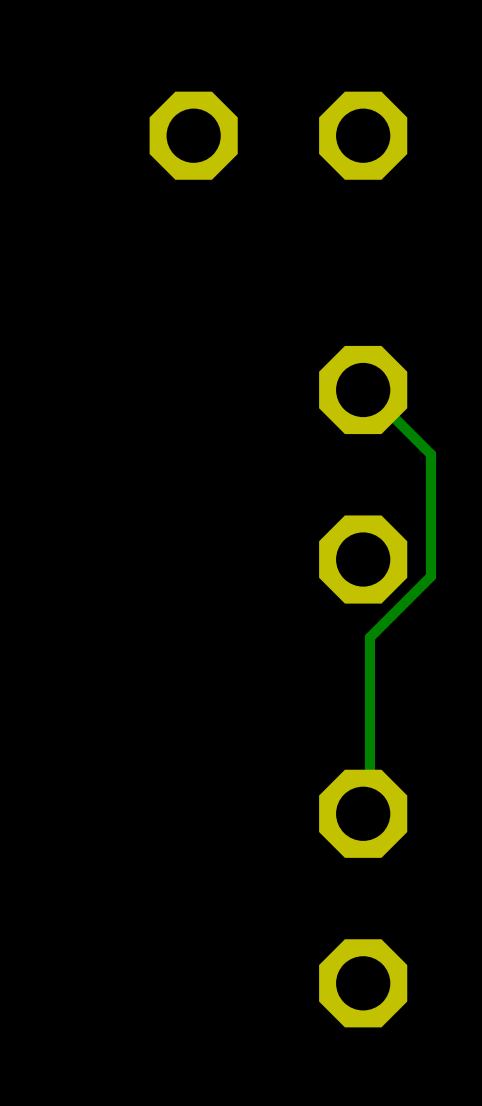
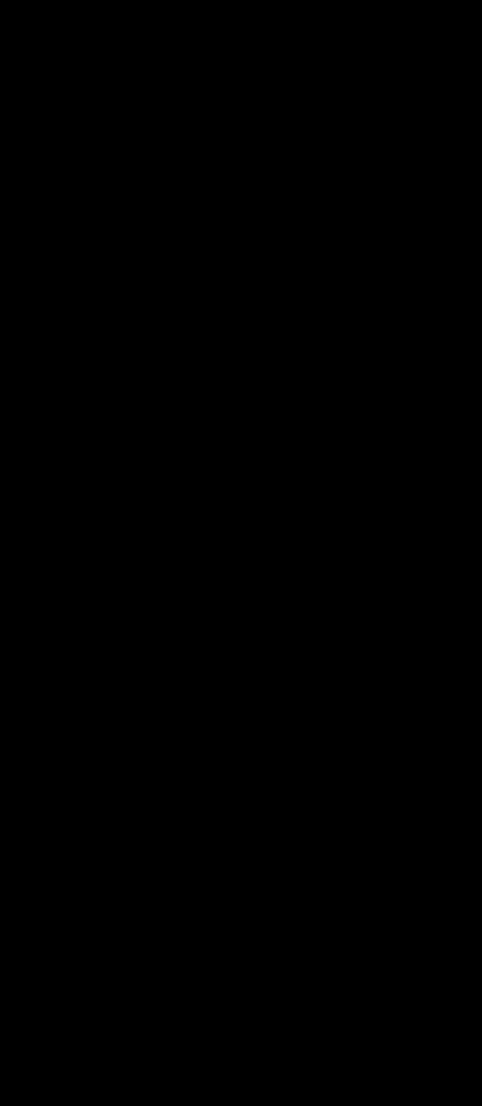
part: (278, 135) -> none
track: (363, 390) (369, 393) (430, 454) (430, 576) (369, 637) (369, 810) (363, 813) -> none
part: (363, 474) -> none
part: (363, 898) -> none

